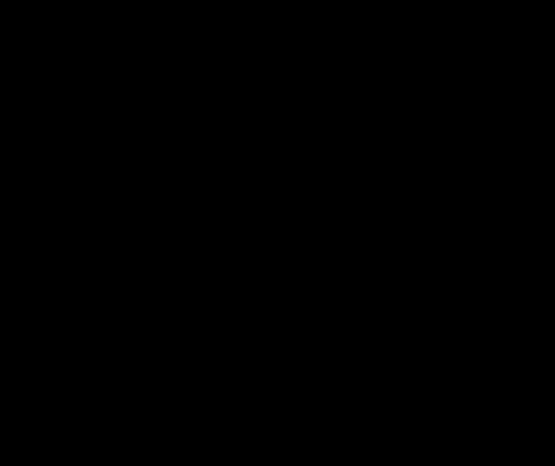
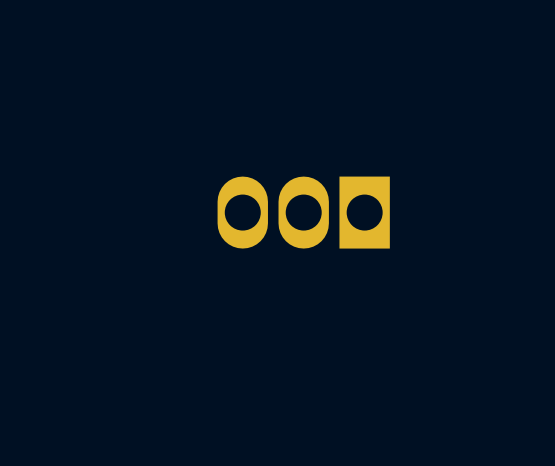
part: none -> (303, 212)

